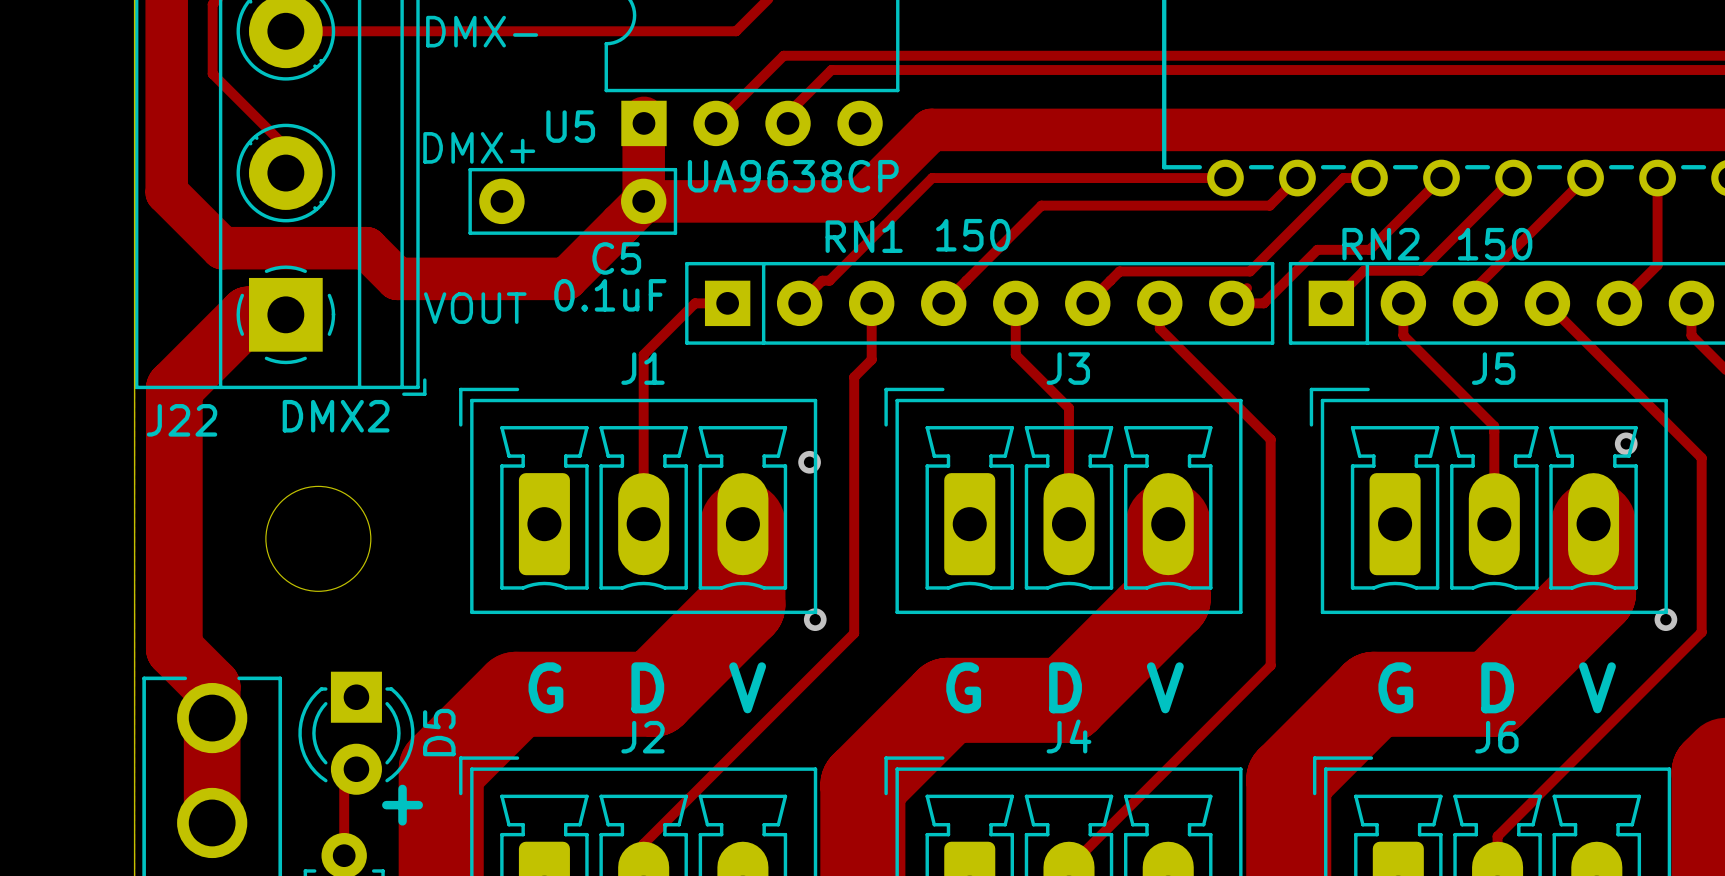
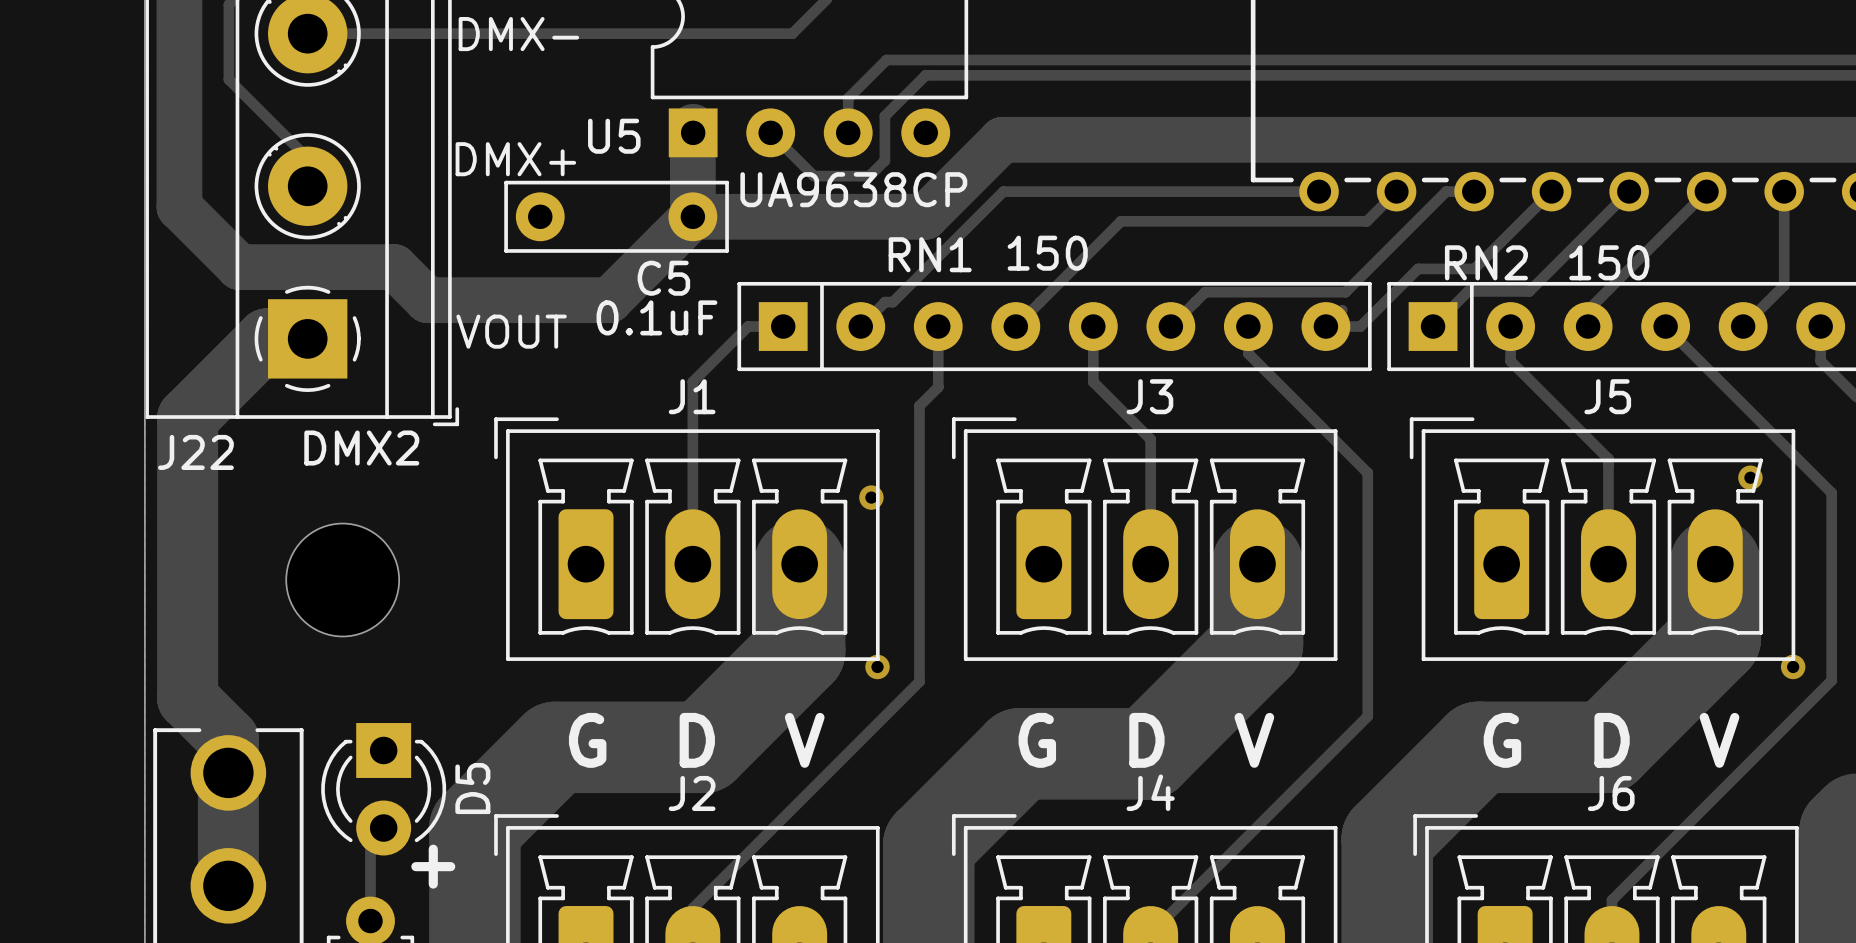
track: (823, 55) (783, 55) (716, 123) -> (925, 75) (884, 116) (884, 160) (869, 176) (813, 176) (770, 132)
track: (860, 70) (831, 70) (788, 113) -> (886, 60) (848, 98) (848, 122)

